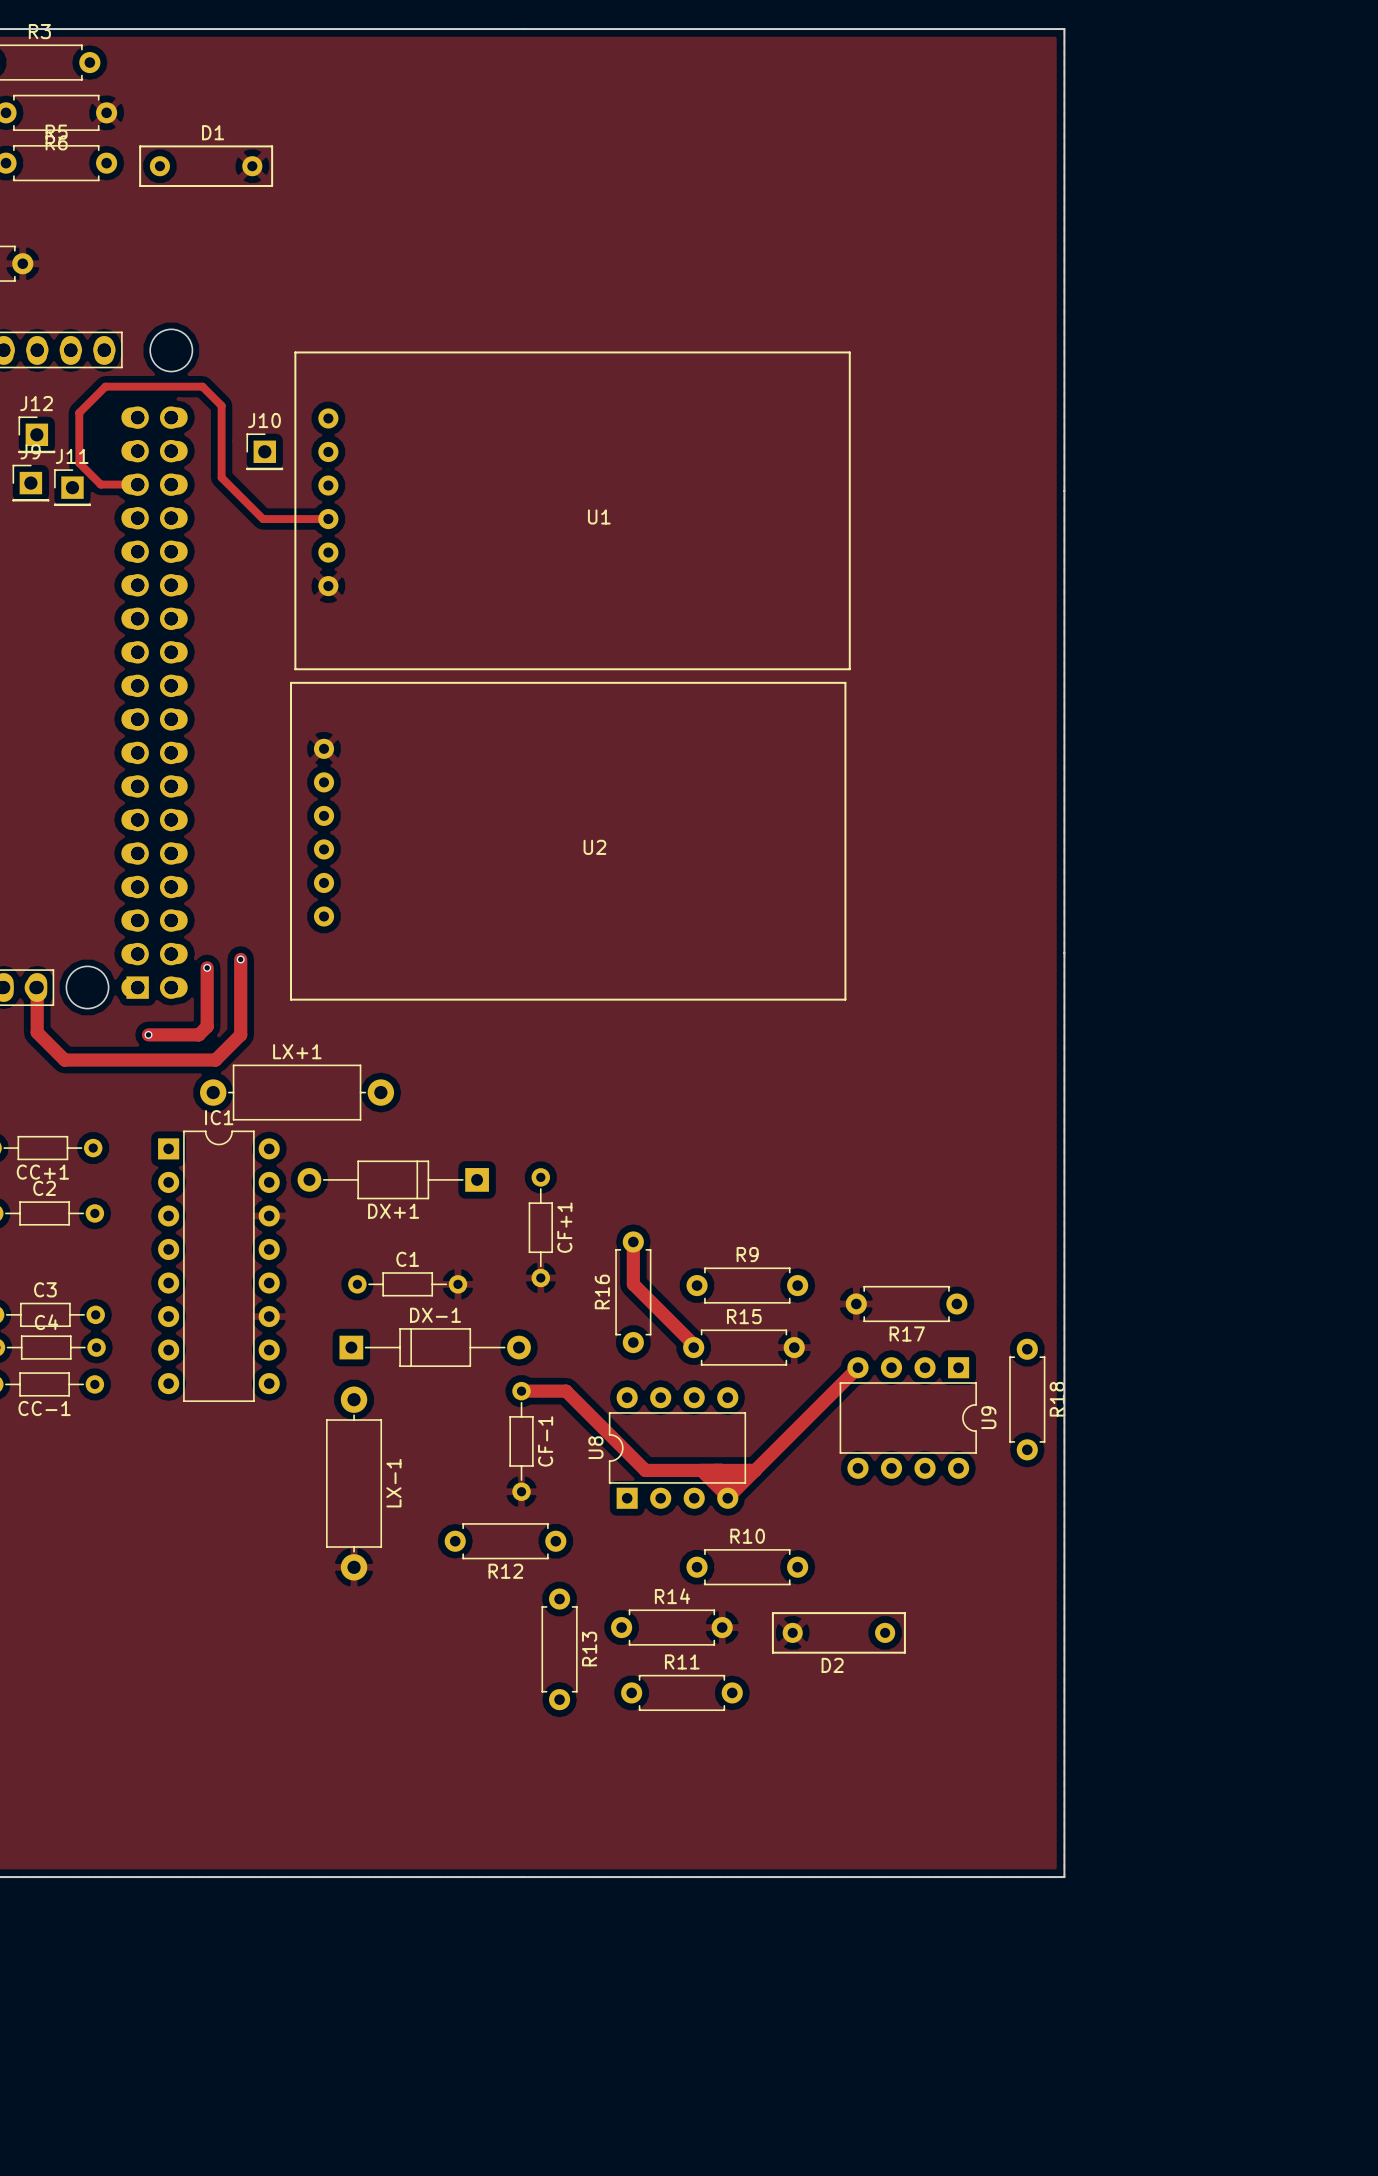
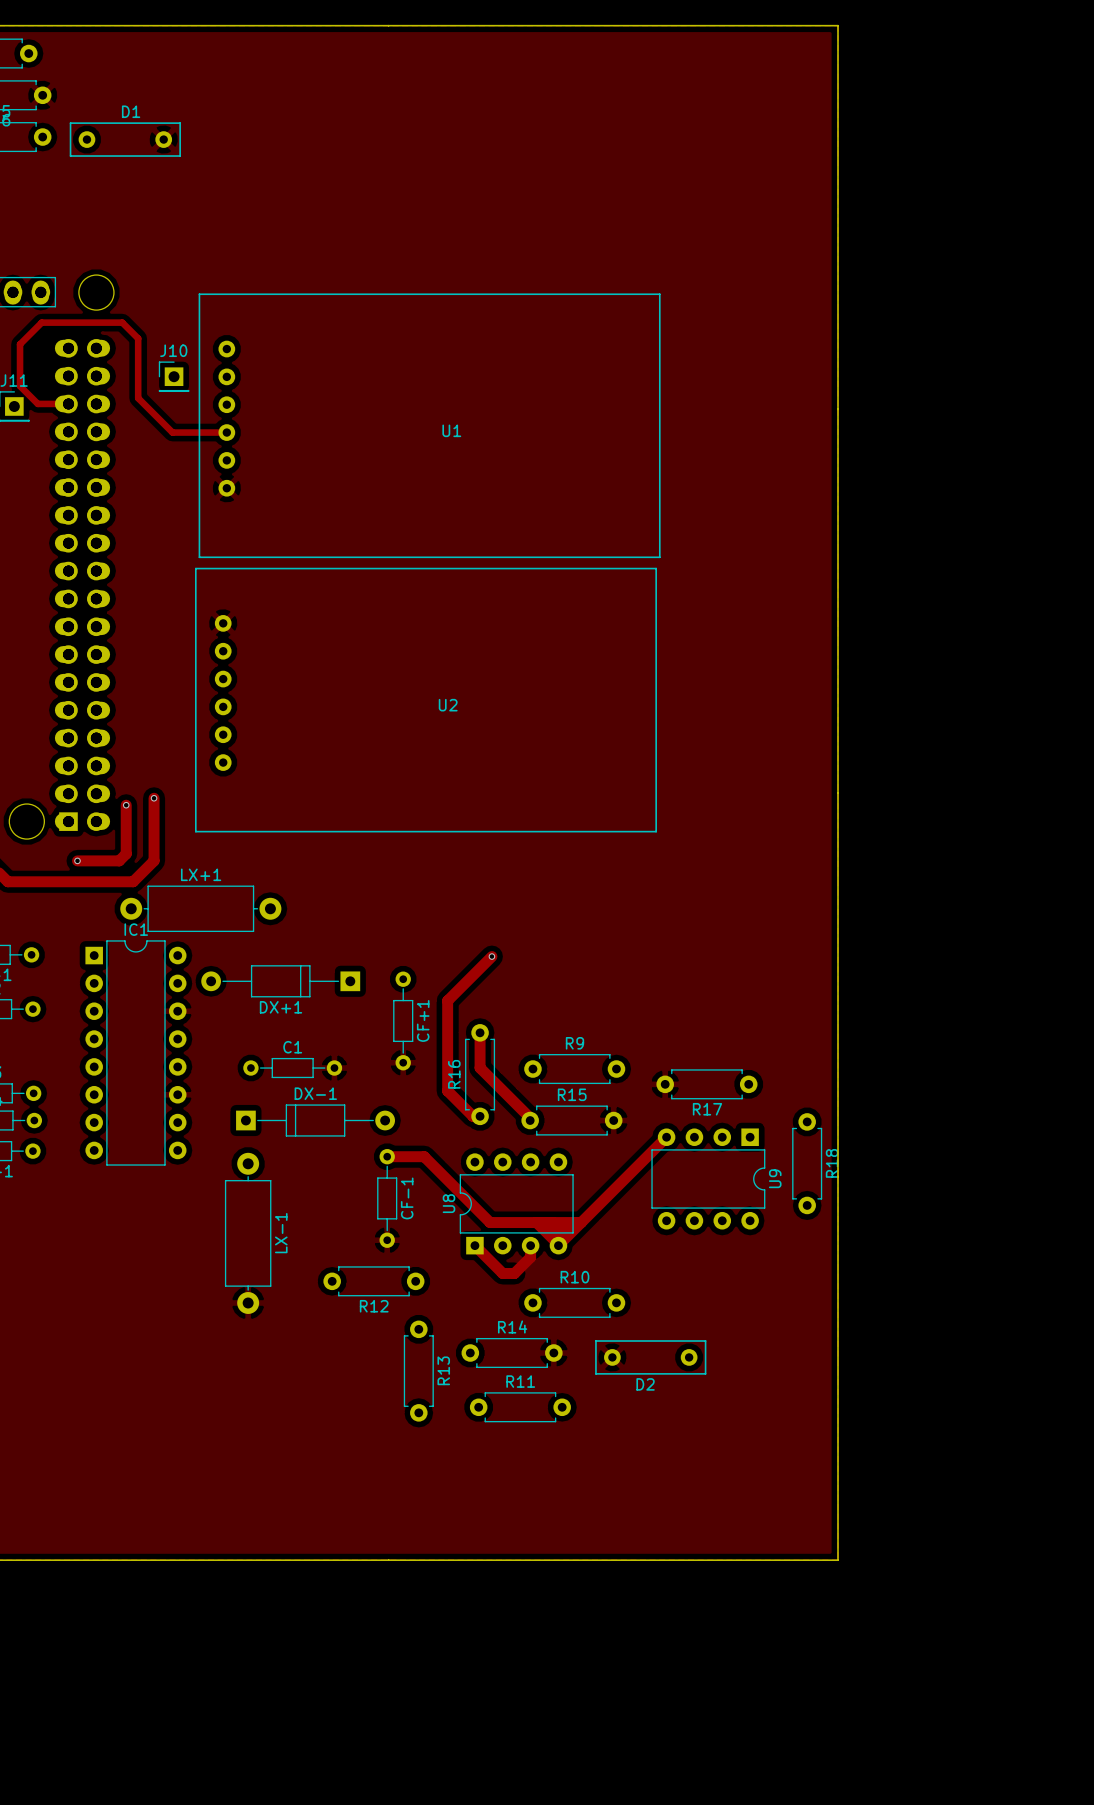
track: none -> (491, 956) (447, 1000) (447, 1091) (472, 1116) (480, 1116)
via: none -> (491, 956)
track: none -> (474, 1245) (502, 1273) (514, 1273) (530, 1257) (530, 1245)

